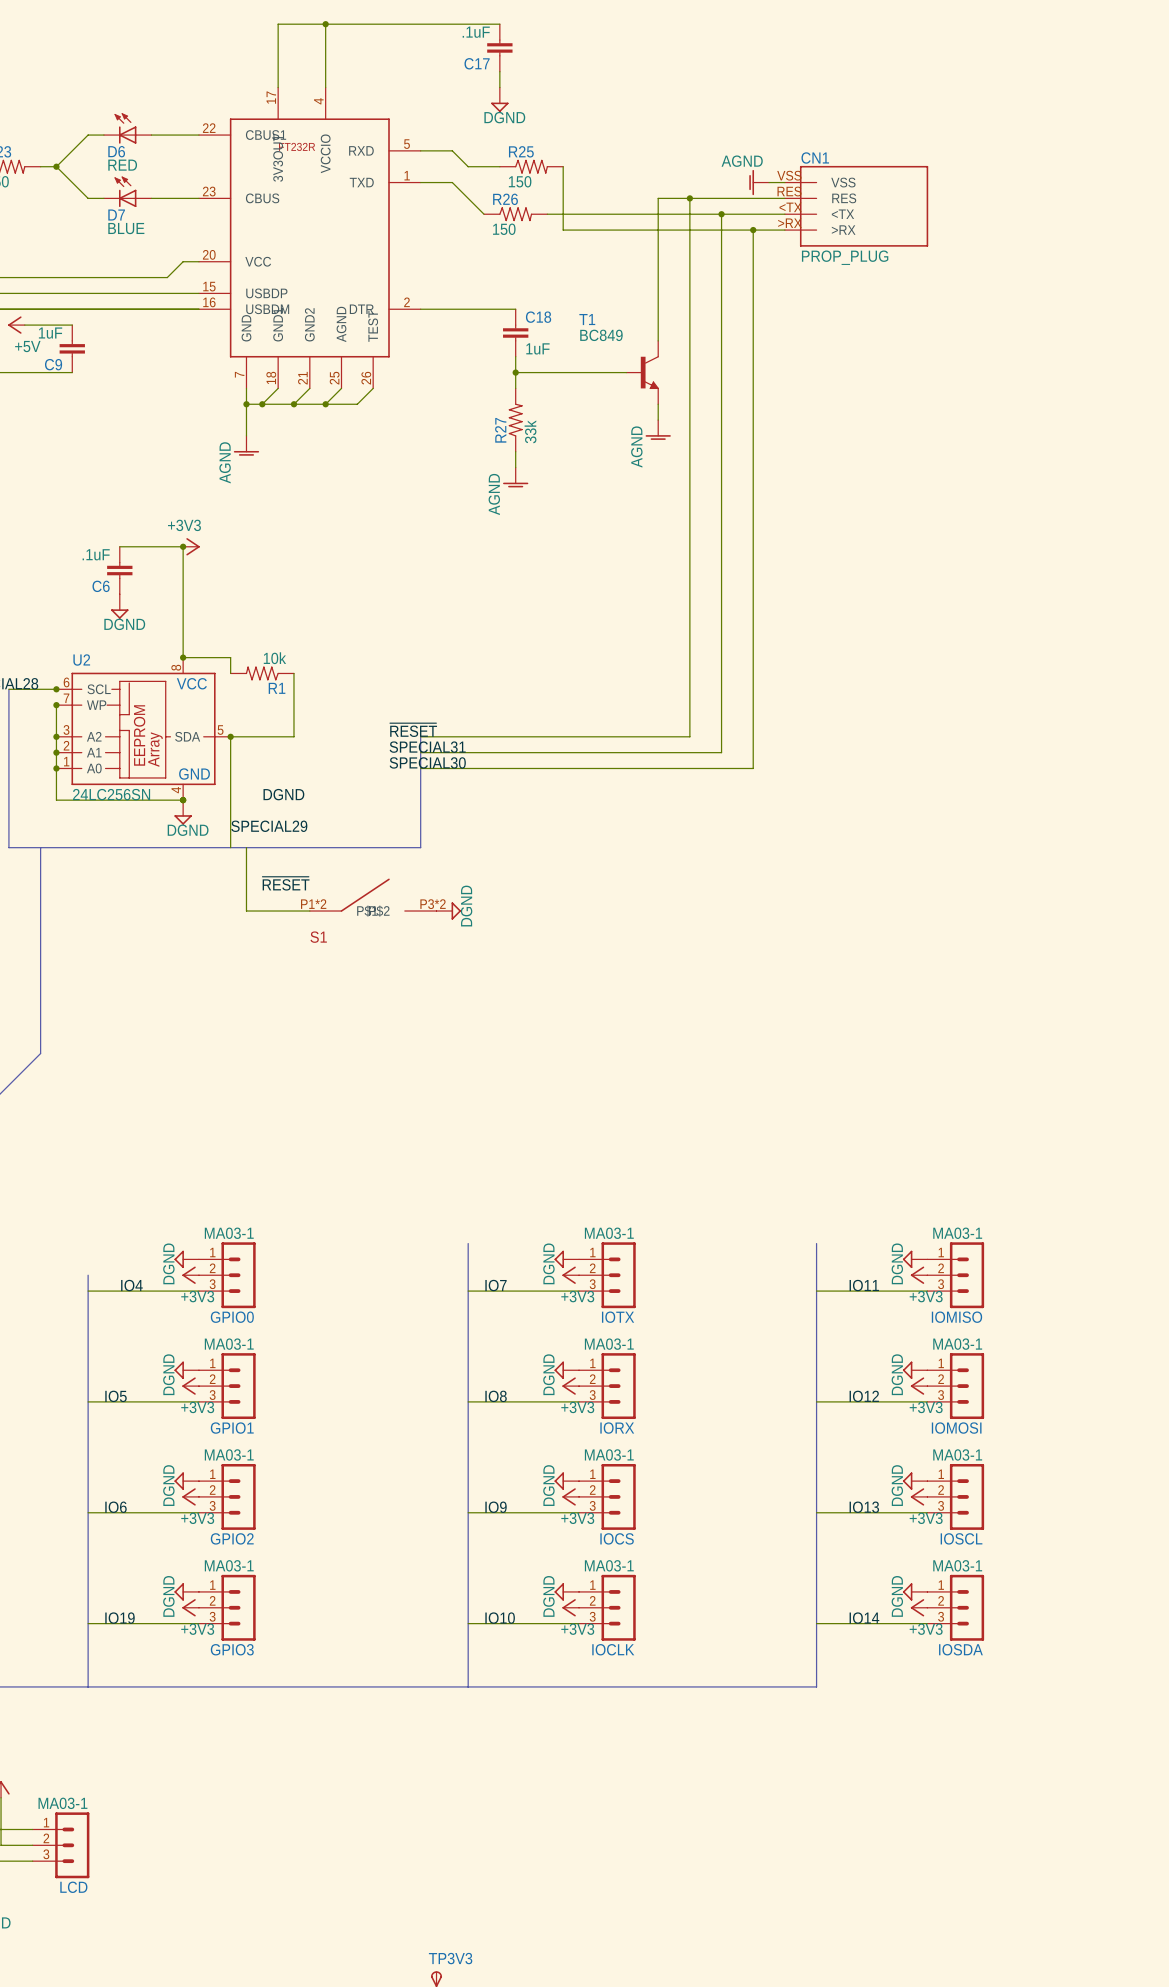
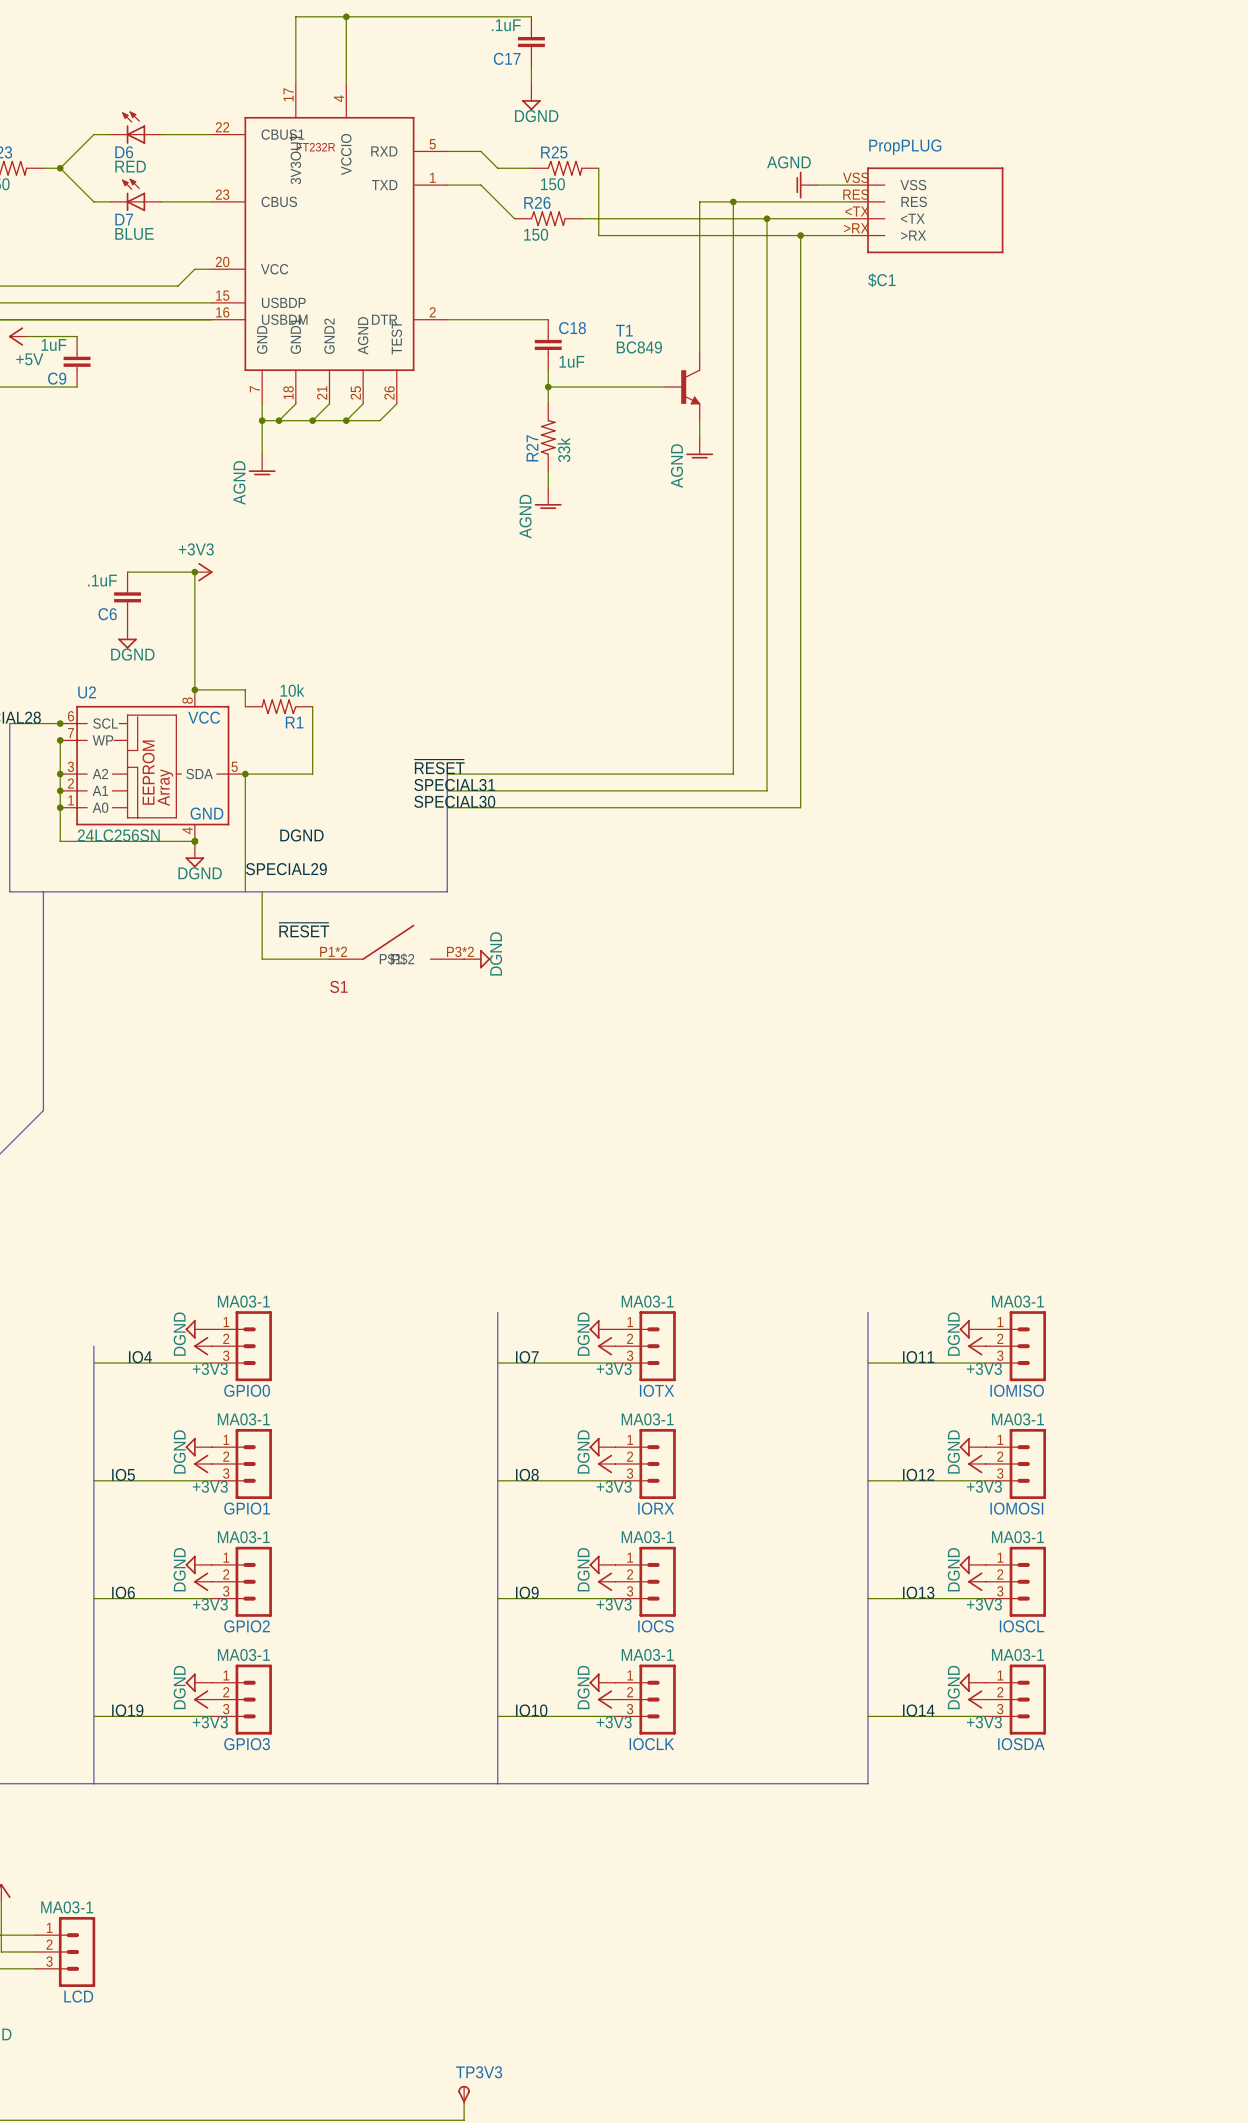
CN1: PROP_PLUG (856, 206) -> none
part: none -> (927, 210)

